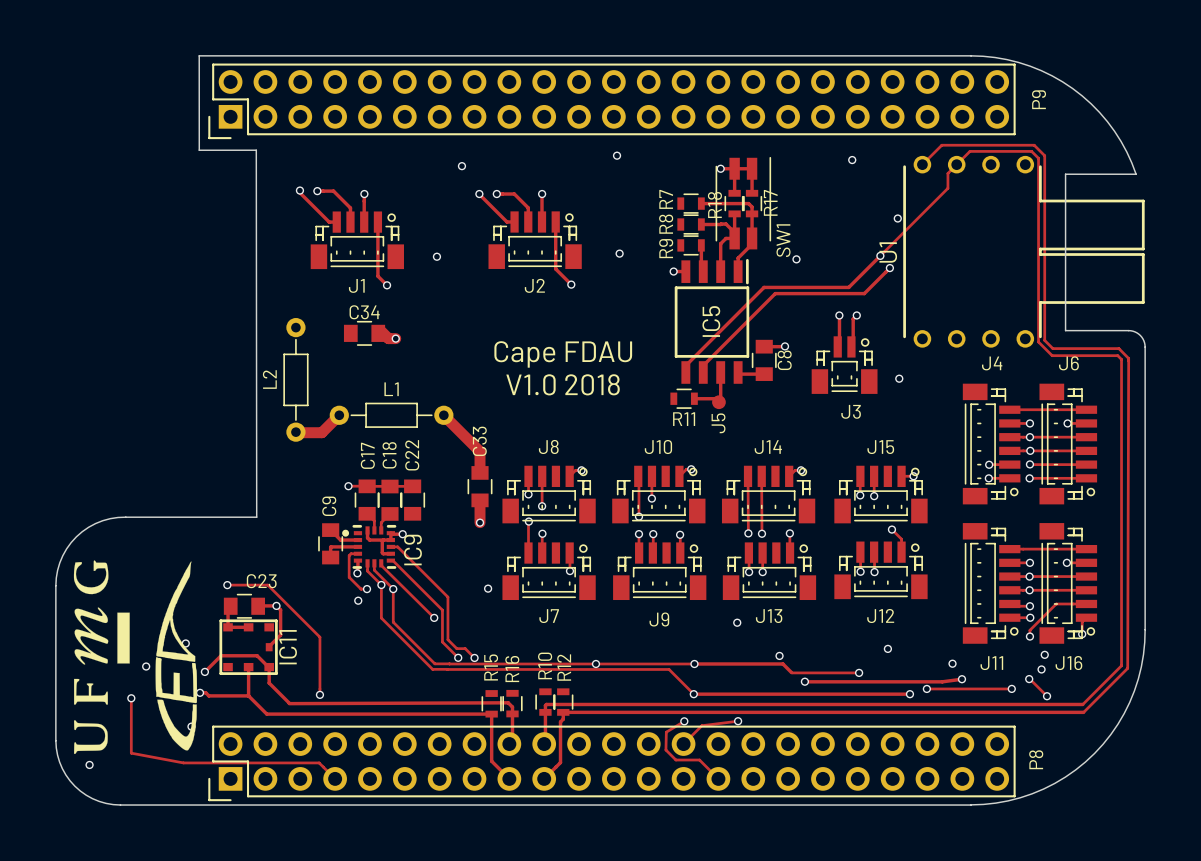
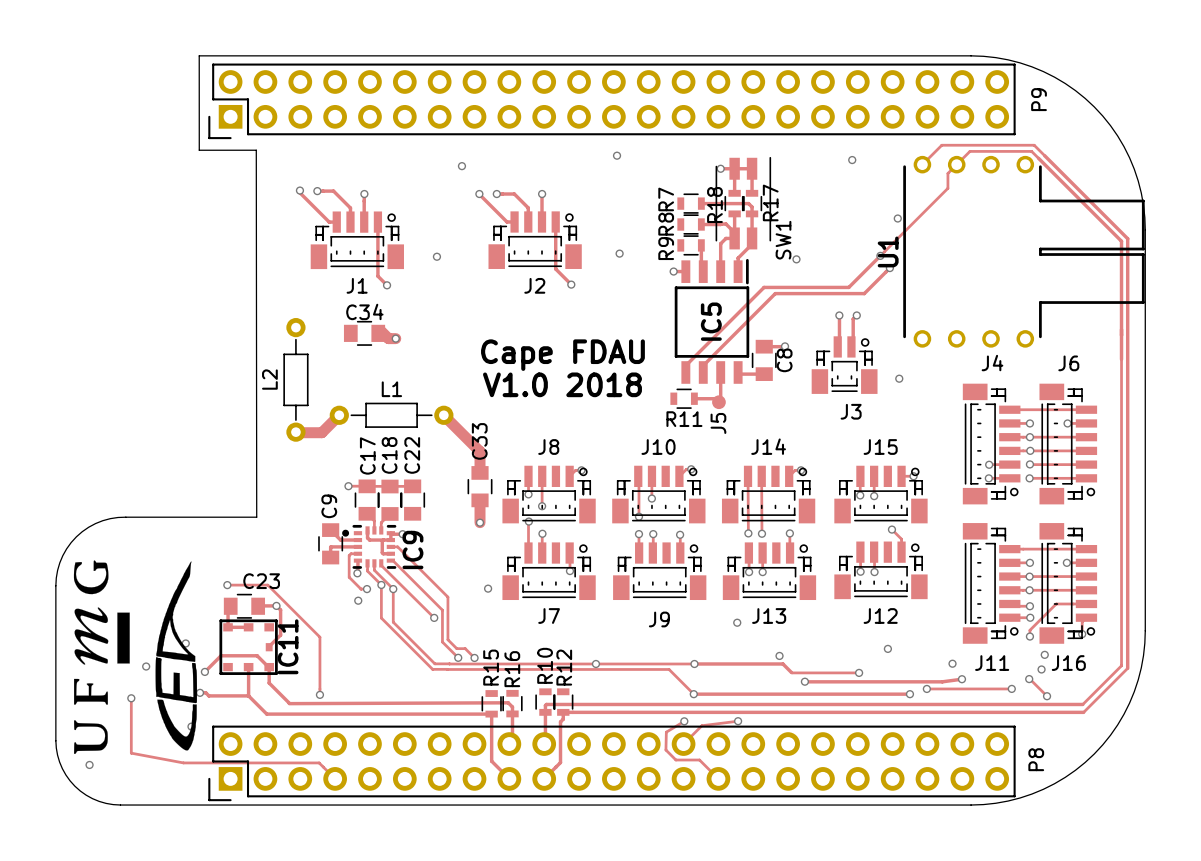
board edge: (971, 55) (995, 57) (1018, 62) (1041, 70) (1072, 88) (1091, 103) (1107, 121) (1126, 152) (1136, 174) (1065, 174) (1065, 330) (1130, 330) (1138, 334) (1144, 342) (1145, 629) (1143, 654) (1134, 690) (1117, 724) (1094, 753) (1075, 769) (1043, 789) (1008, 800) (971, 804) -> (971, 55) (1008, 59) (1031, 66) (1065, 83) (1094, 106) (1117, 135) (1129, 157) (1141, 193) (1145, 230) (1145, 630) (1143, 655) (1138, 679) (1129, 703) (1117, 725) (1102, 744) (1075, 770) (1054, 783) (1020, 797) (995, 803) (971, 805)
track: (1044, 155) (1044, 340) (1052, 348) (1118, 348) (1128, 358) (1127, 668) -> (1044, 155) (1127, 238) (1127, 668)
track: (1038, 158) (1038, 342) (1052, 355) (1117, 355) (1121, 359) -> (1038, 158) (1121, 241) (1121, 359)

